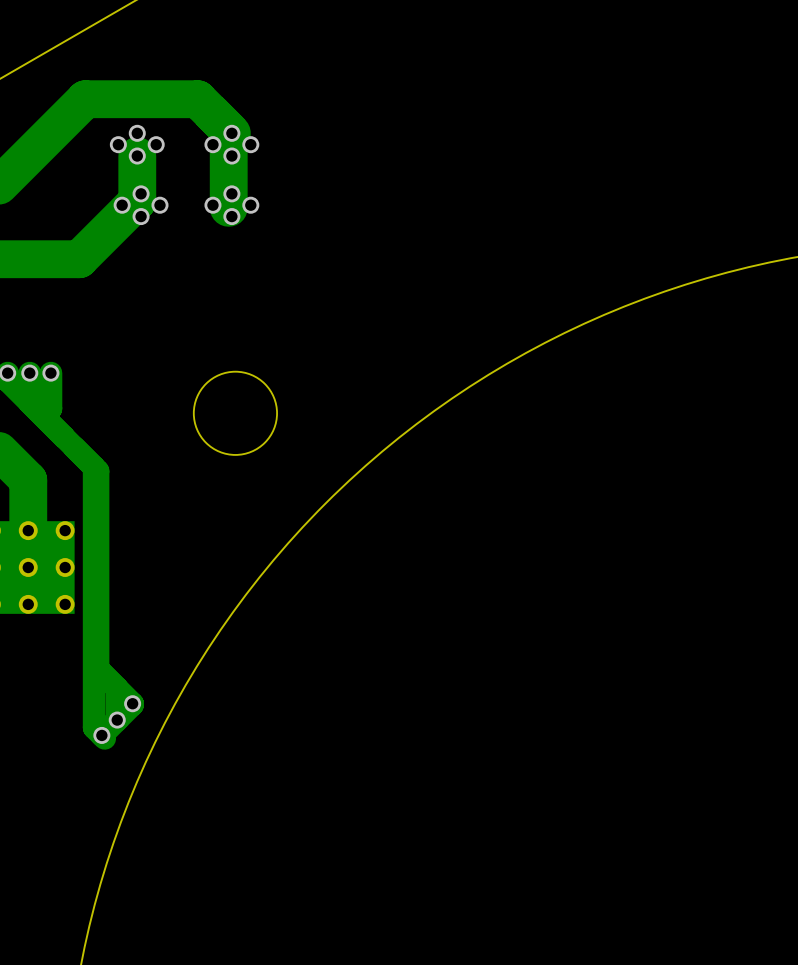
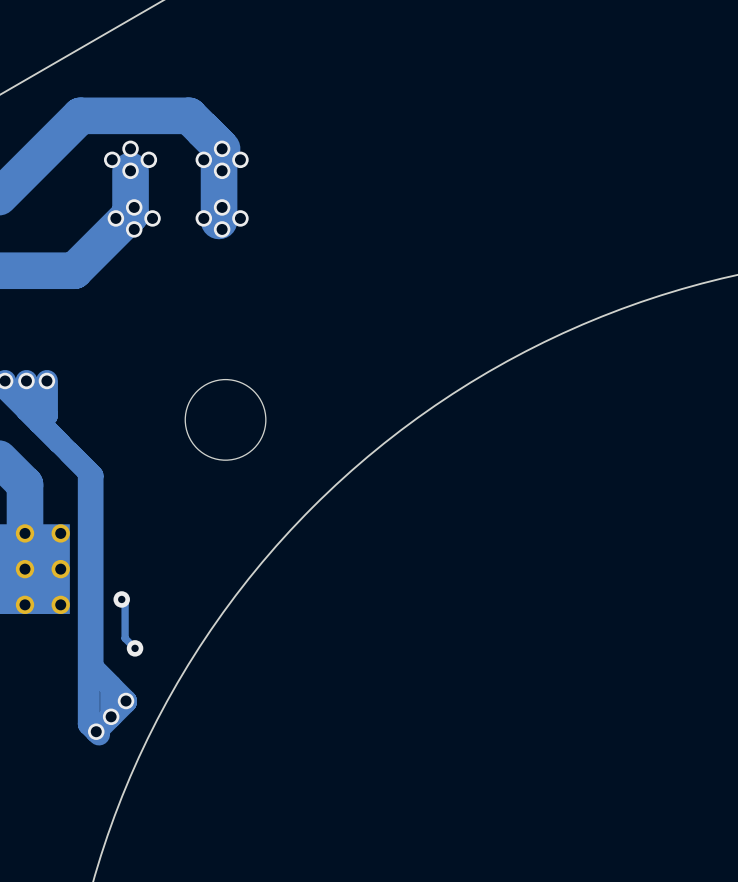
track: none -> (121, 599) (125, 602) (125, 638) (135, 648)
via: none -> (121, 599)
via: none -> (135, 648)

